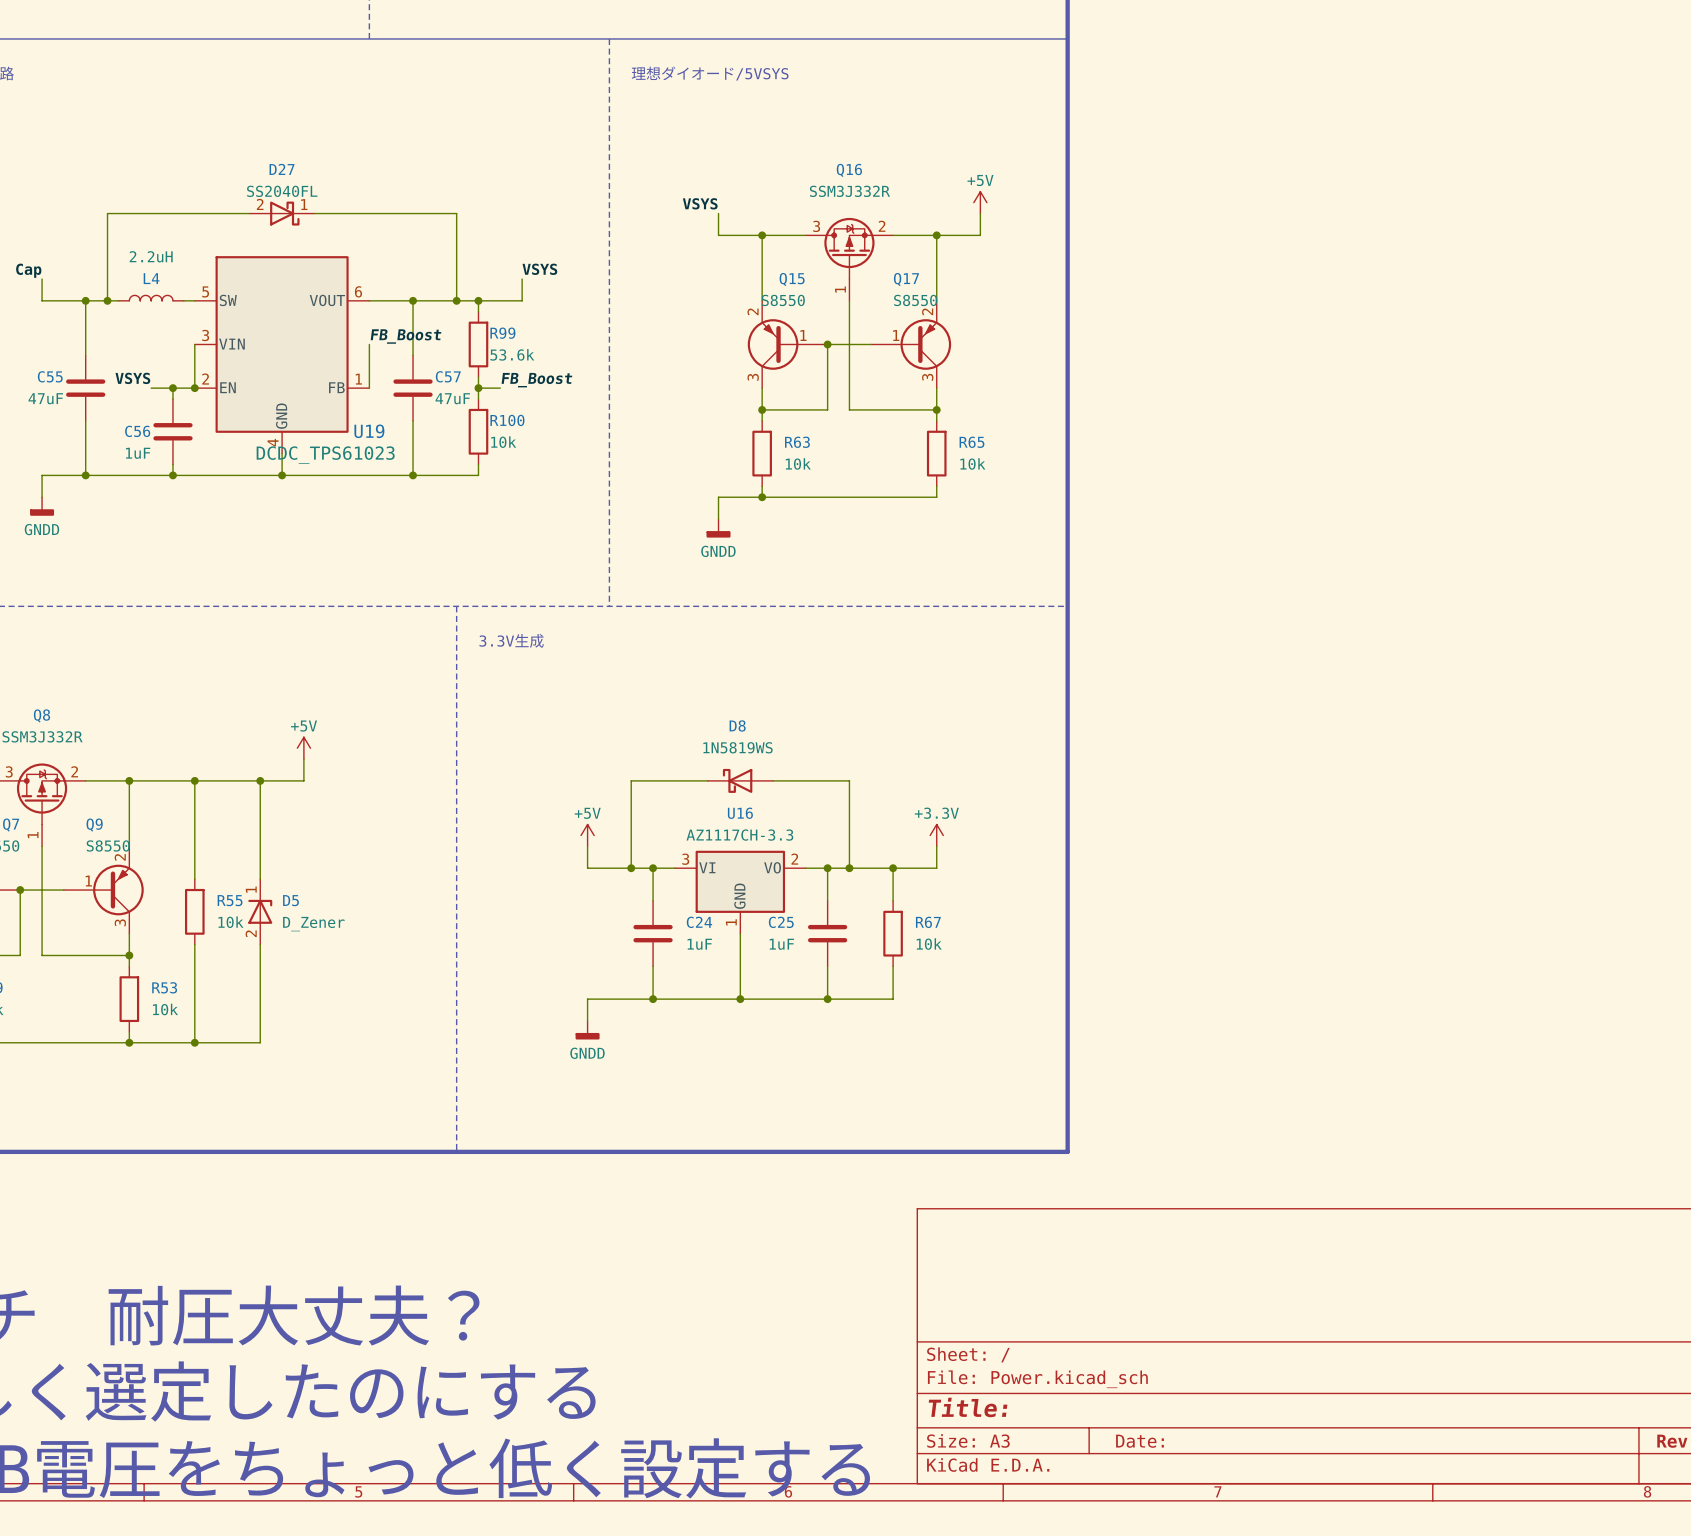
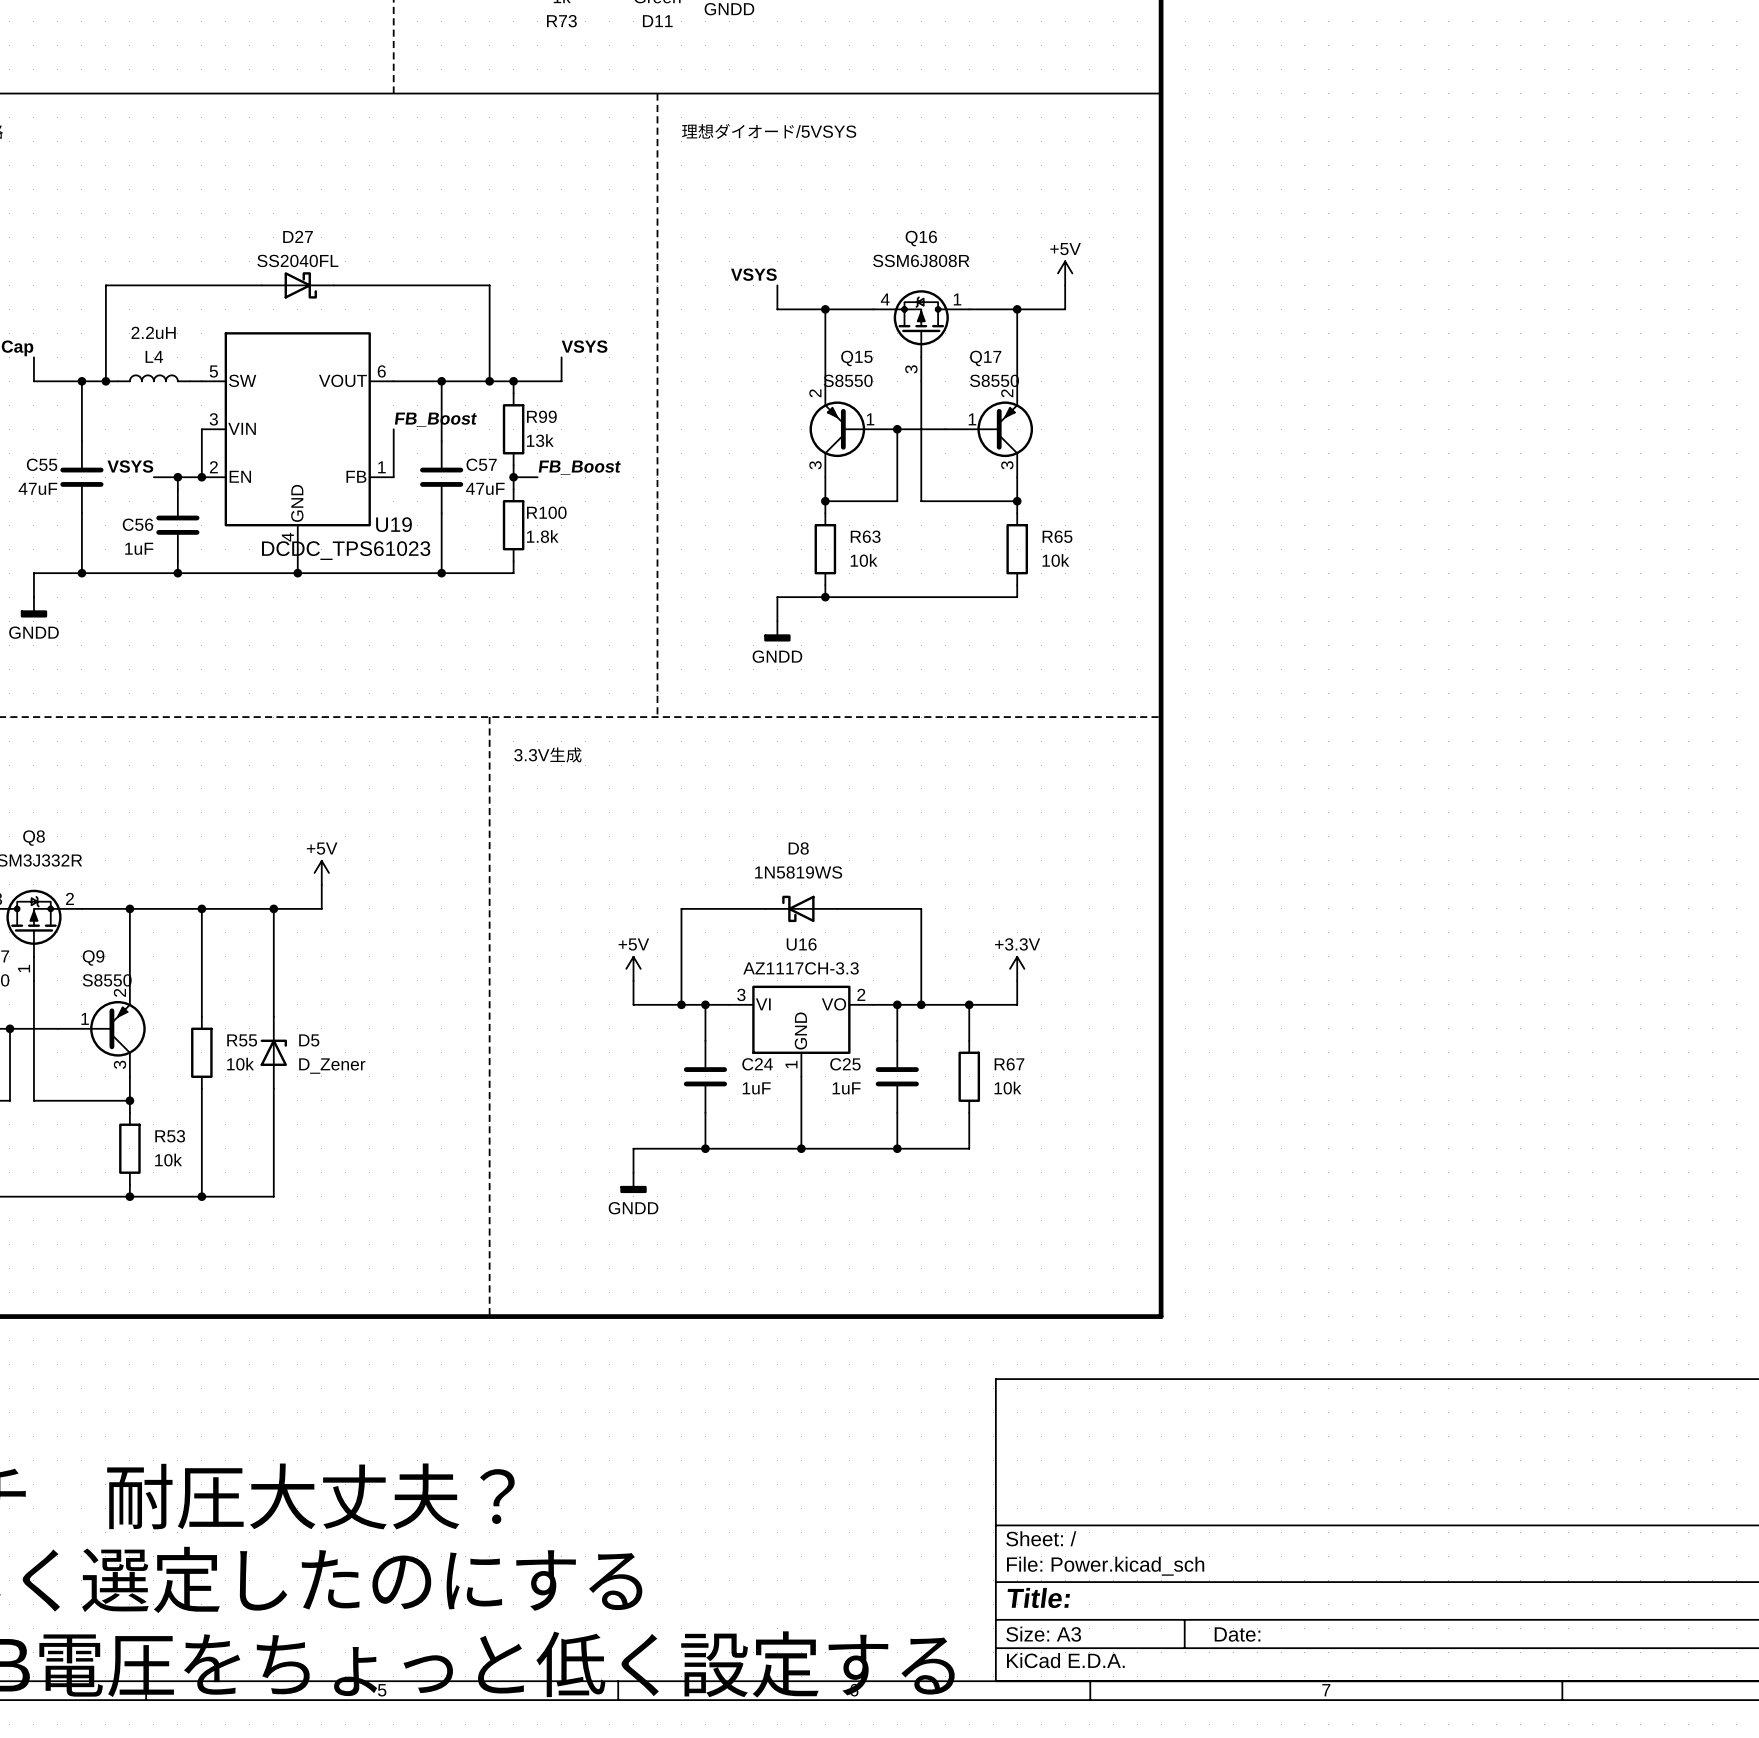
Q16 value: SSM3J332R (849, 191) -> SSM6J808R (921, 260)
D27 pin number: 2 (260, 204) -> none
D27 pin number: 1 (304, 204) -> none
Q16 symbol: [805, 217, 894, 301] -> [873, 290, 970, 382]
R99 value: 53.6k (512, 354) -> 13k (540, 440)
R100 value: 10k (503, 442) -> 1.8k (542, 536)
D5 pin number: 1 (251, 889) -> none
D5 pin number: 2 (251, 933) -> none

